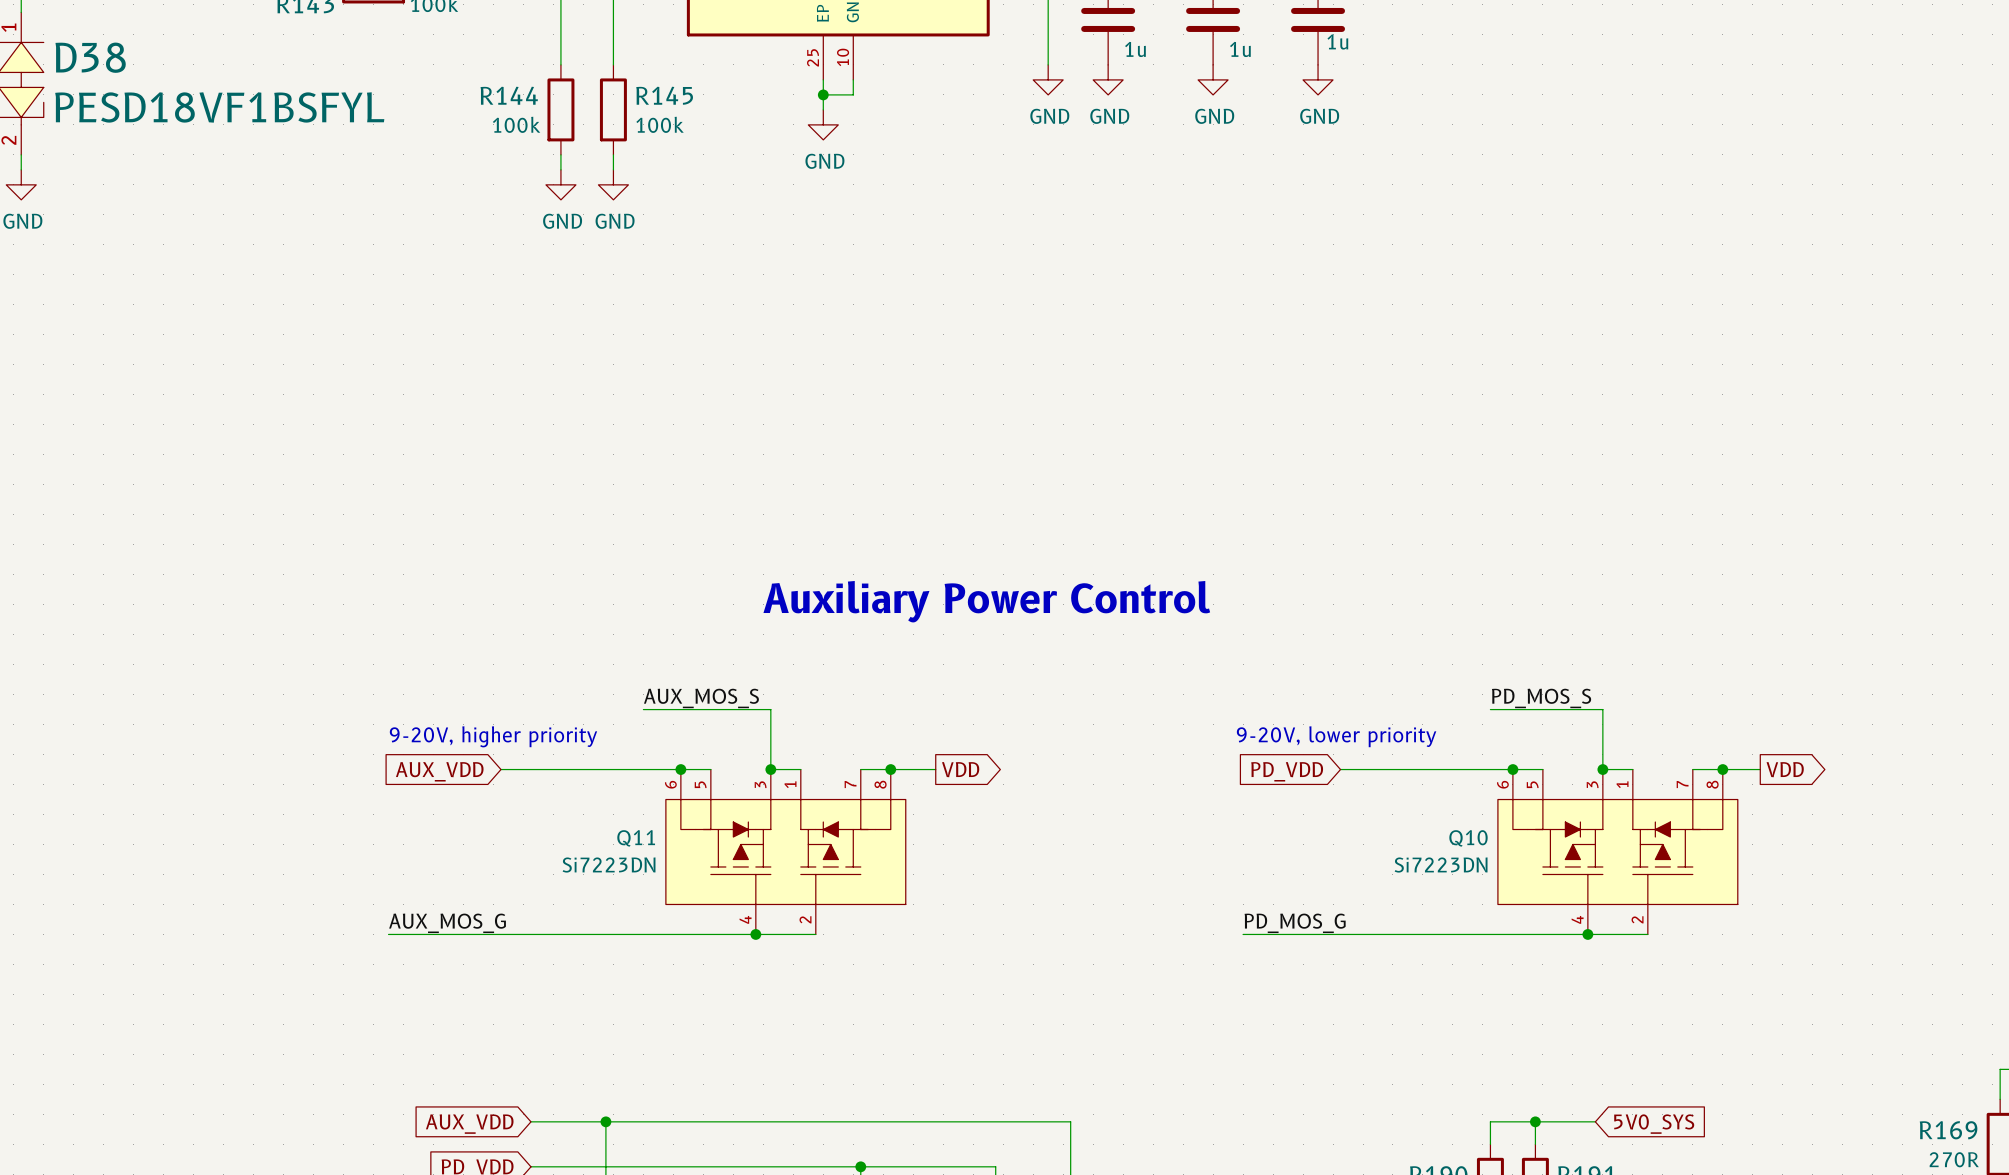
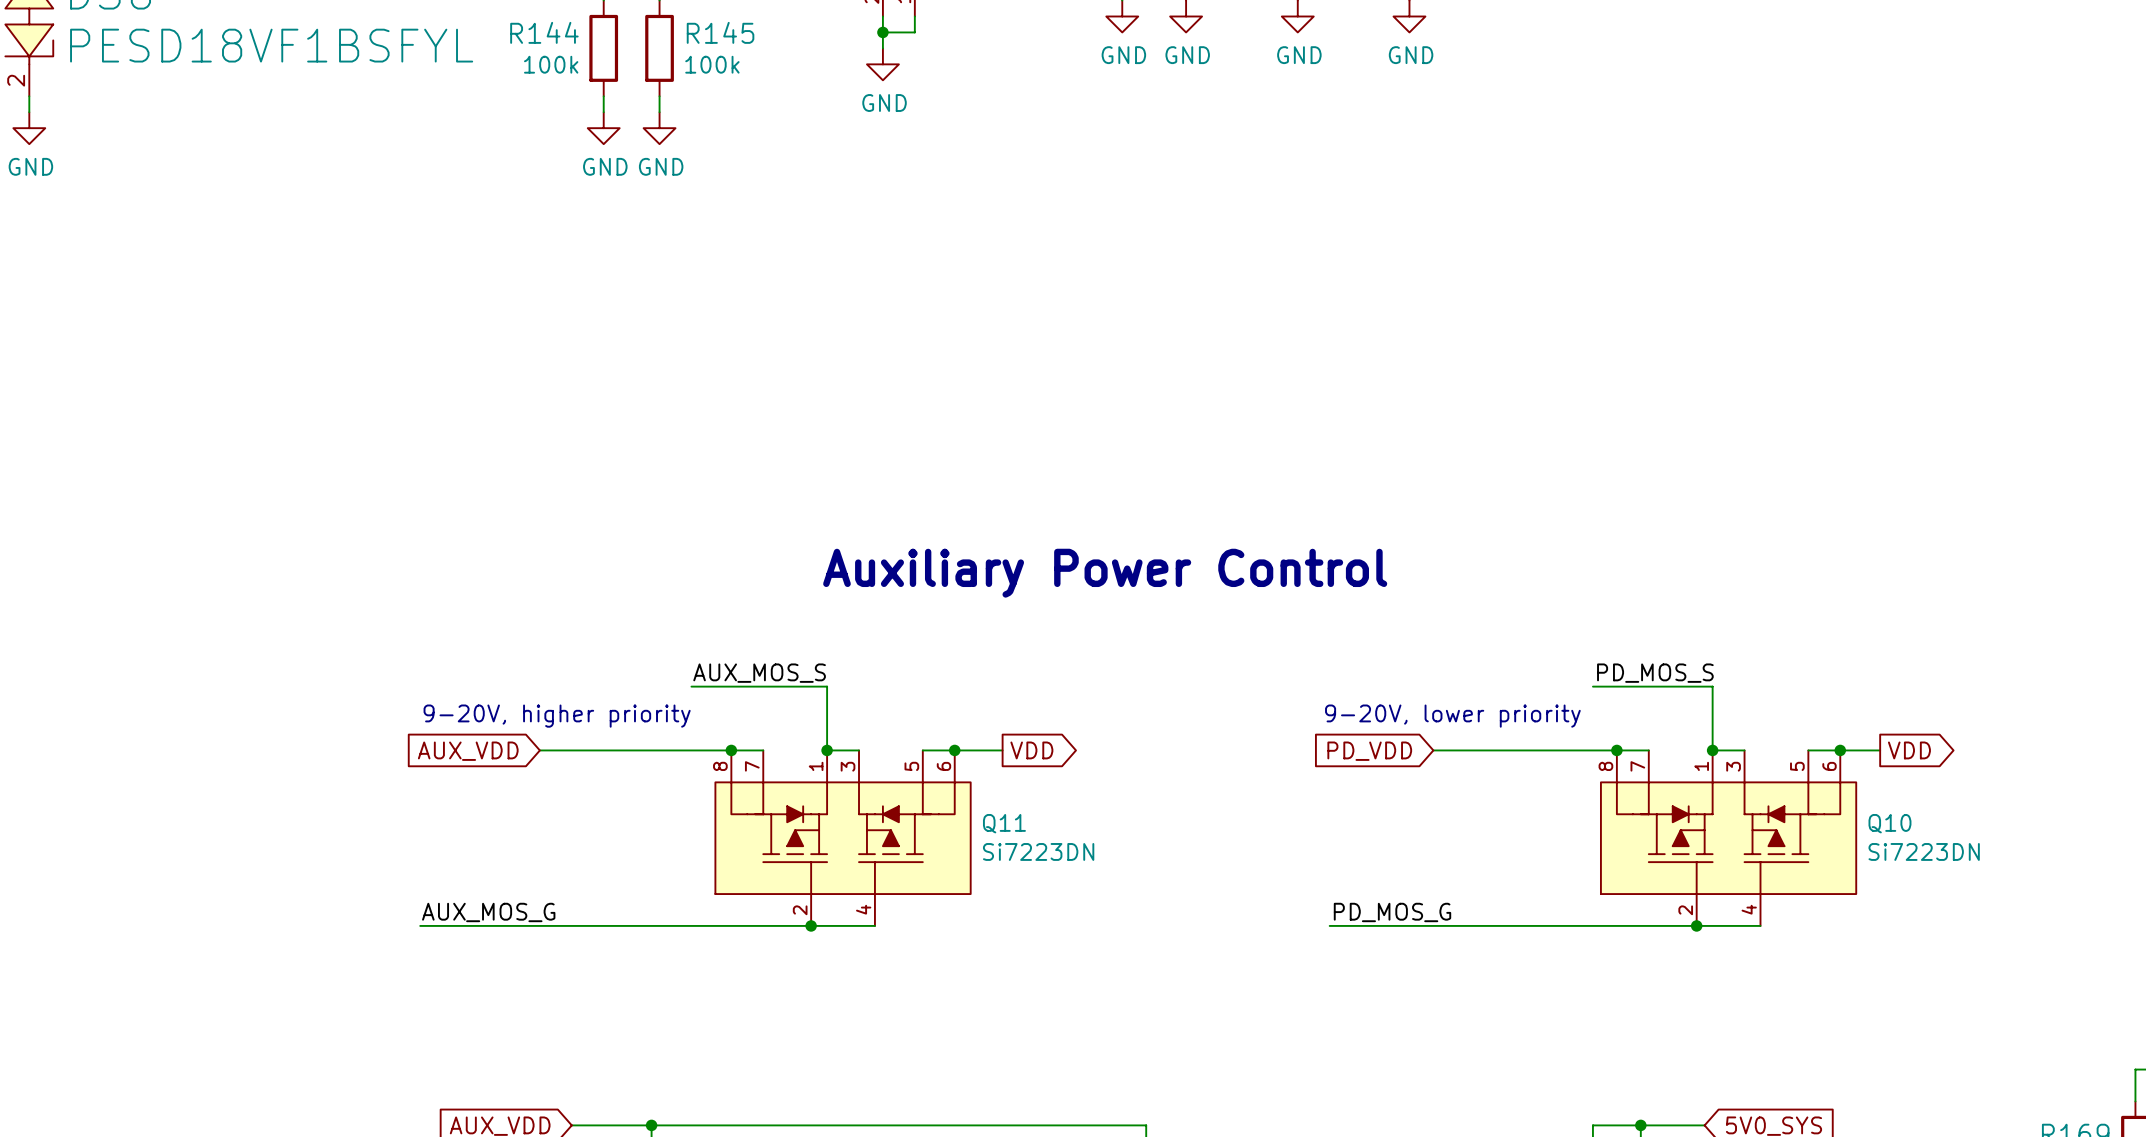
Q11 flip: as is (785, 851) -> left-right (843, 838)
Q10 flip: as is (1617, 851) -> left-right (1728, 838)

